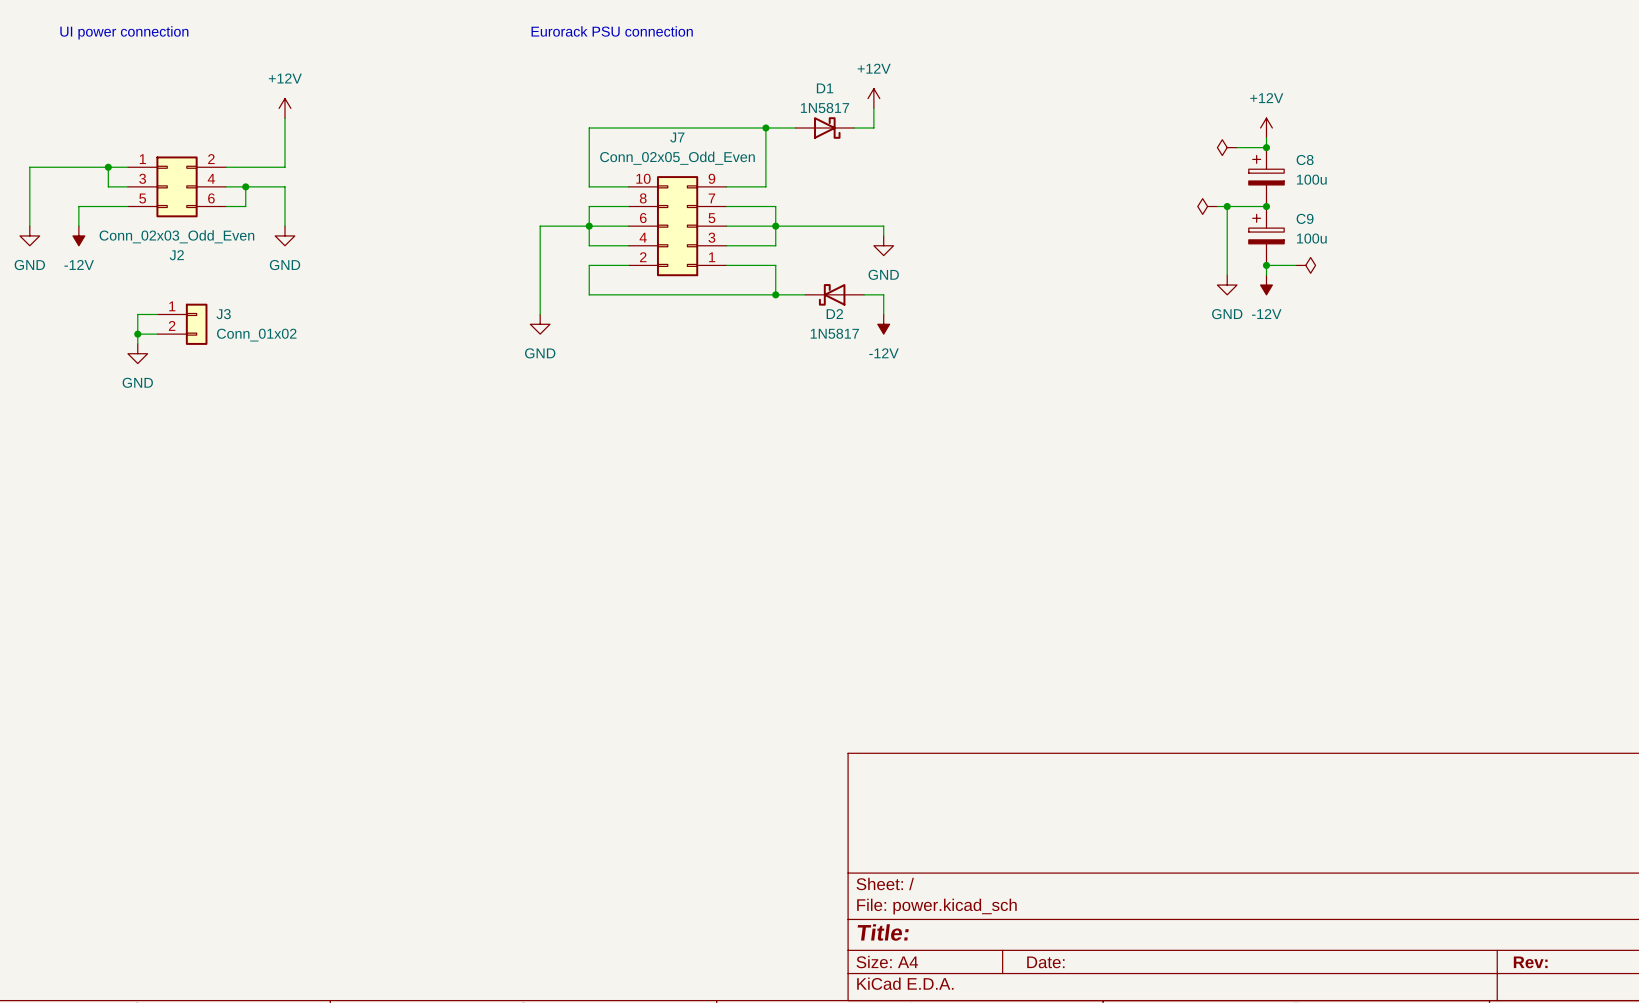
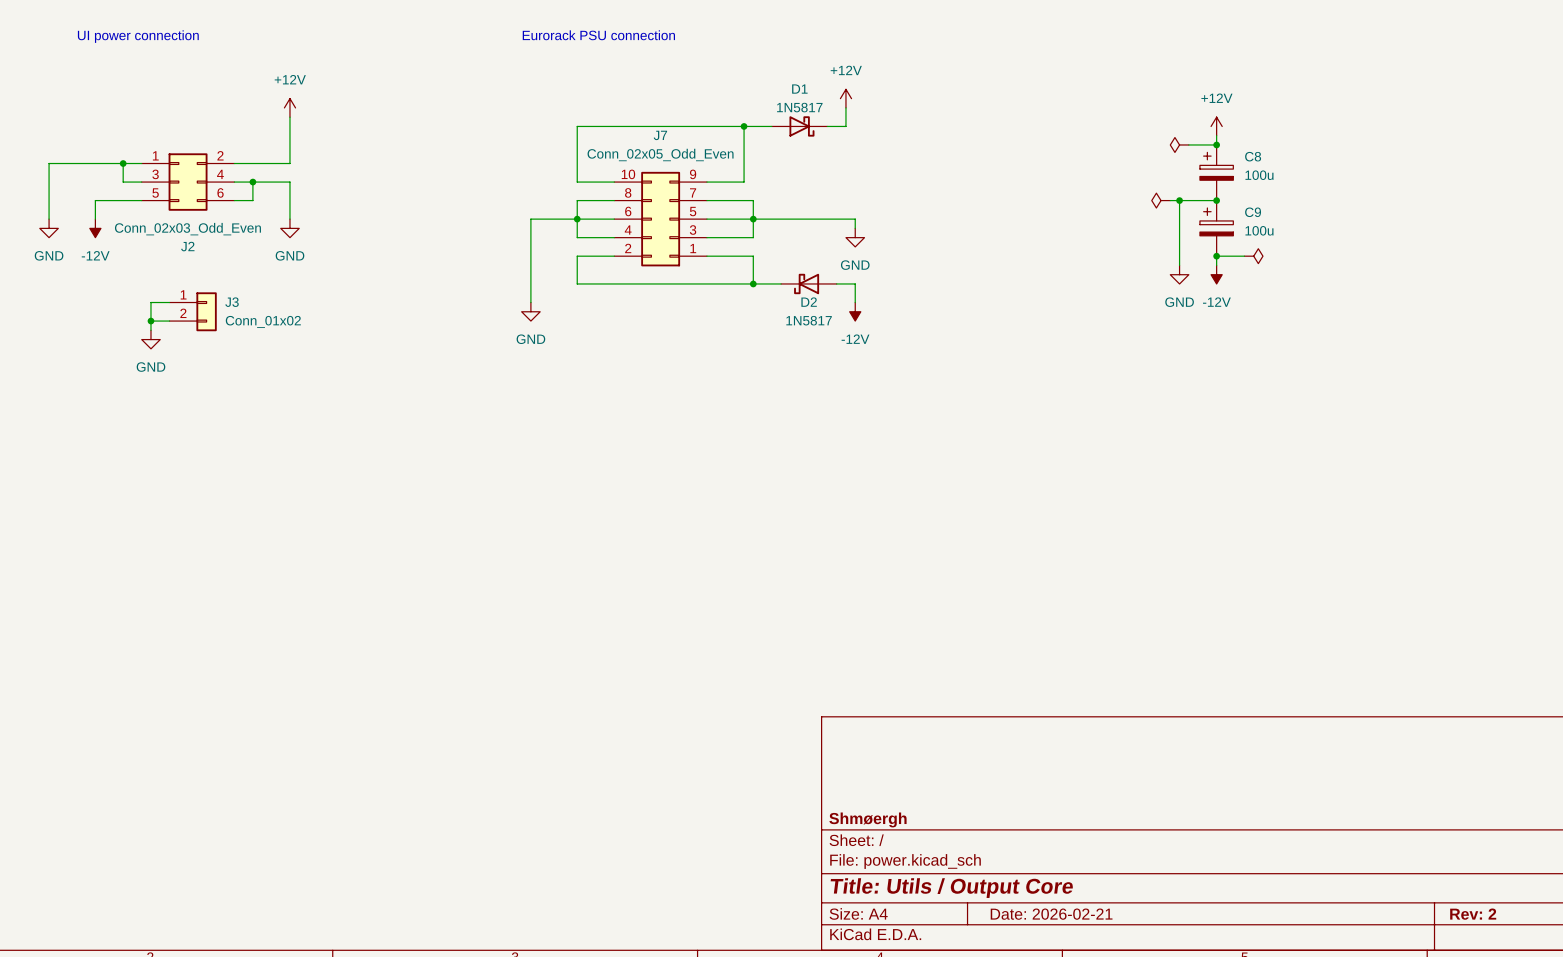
title block: none -> Shmøergh (867, 819)
title block: Title: (883, 932) -> Title: Utils / Output Core (951, 888)
title block: Date: (1045, 962) -> Date: 2026-02-21 (1051, 914)
title block: Rev: (1530, 962) -> Rev: 2 (1473, 914)

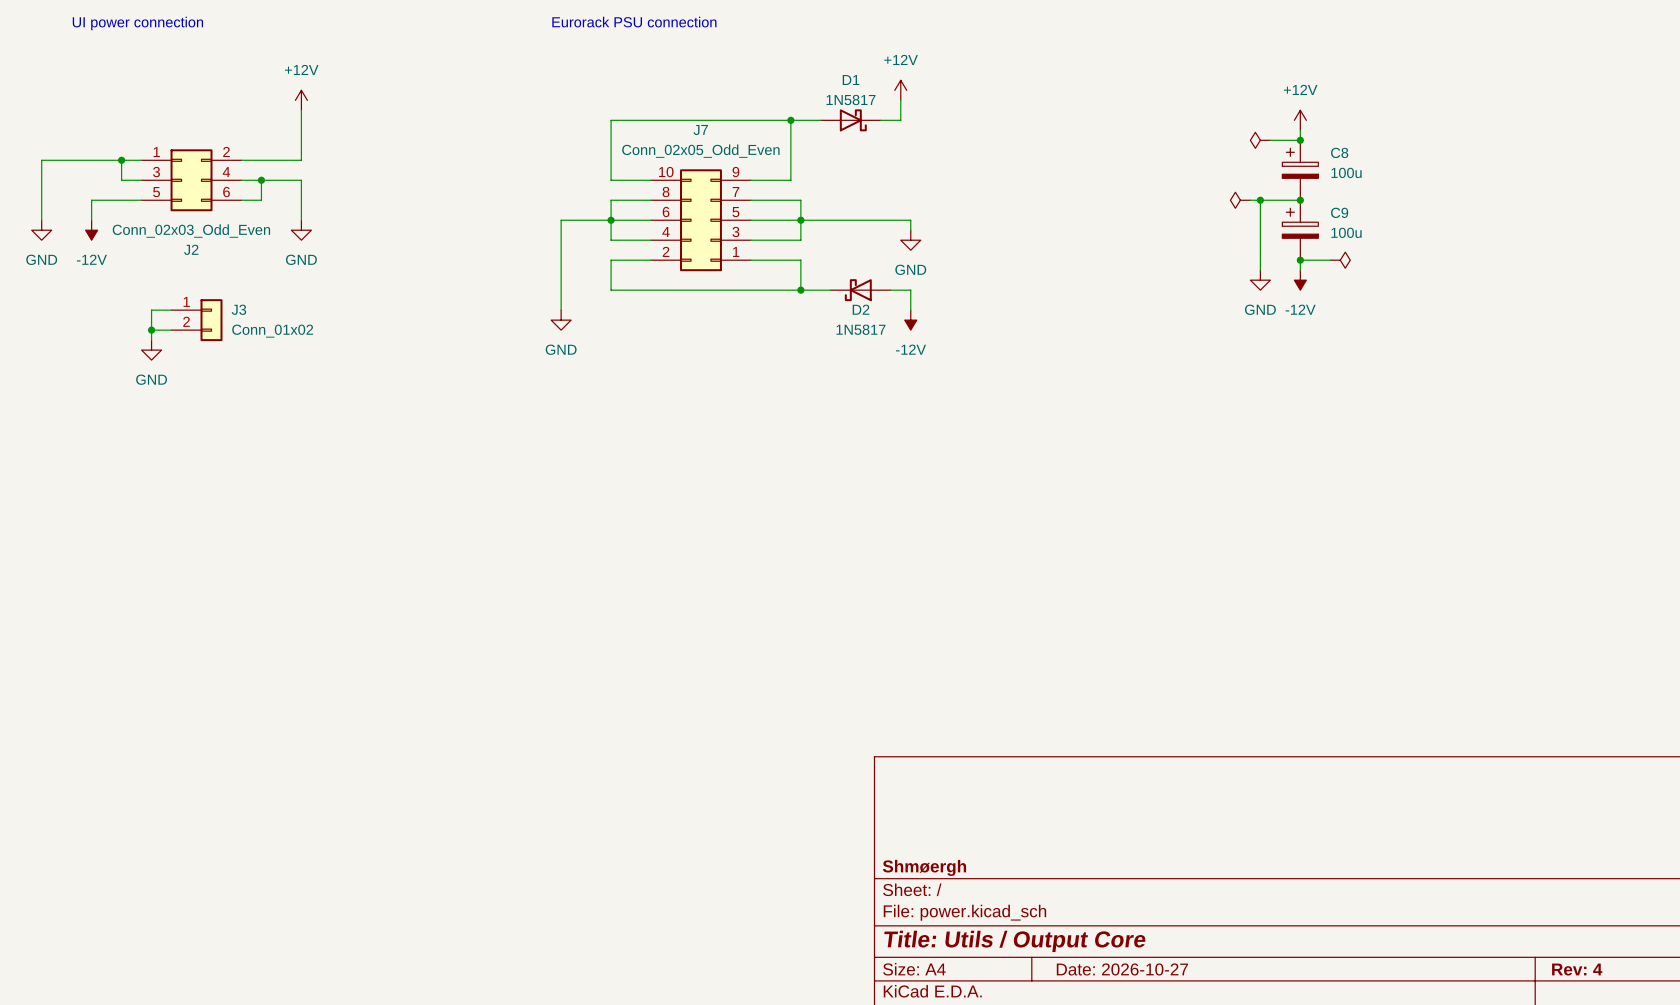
title block: Date: 2026-02-21 (1051, 914) -> Date: 2026-10-27 (1122, 969)
title block: Rev: 2 (1473, 914) -> Rev: 4 (1577, 969)

